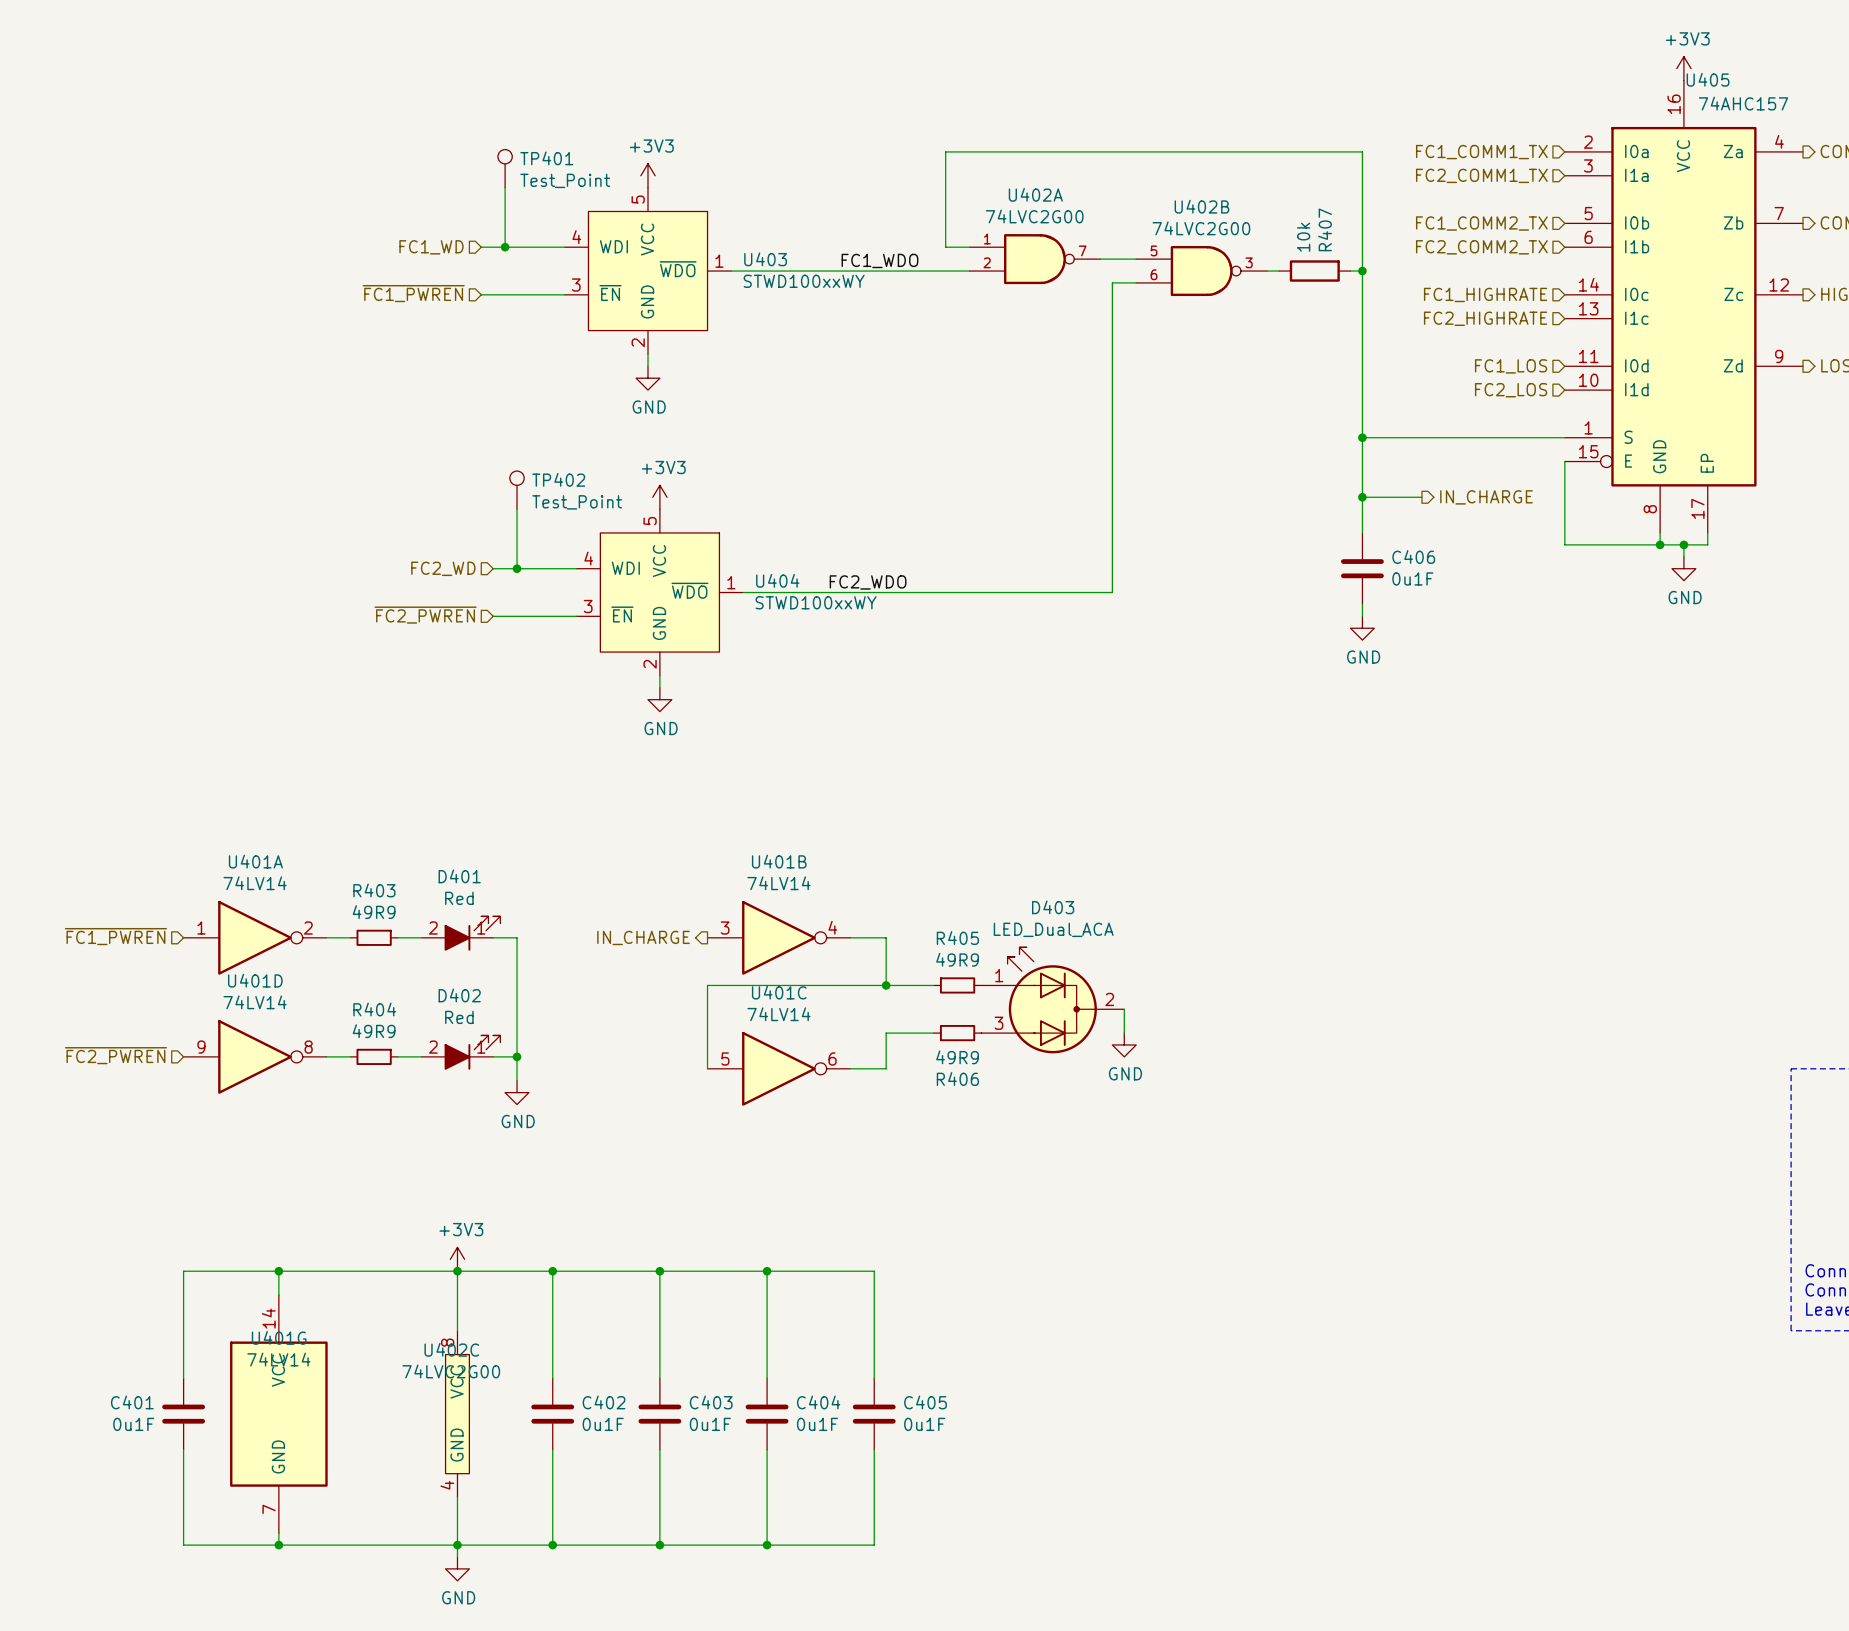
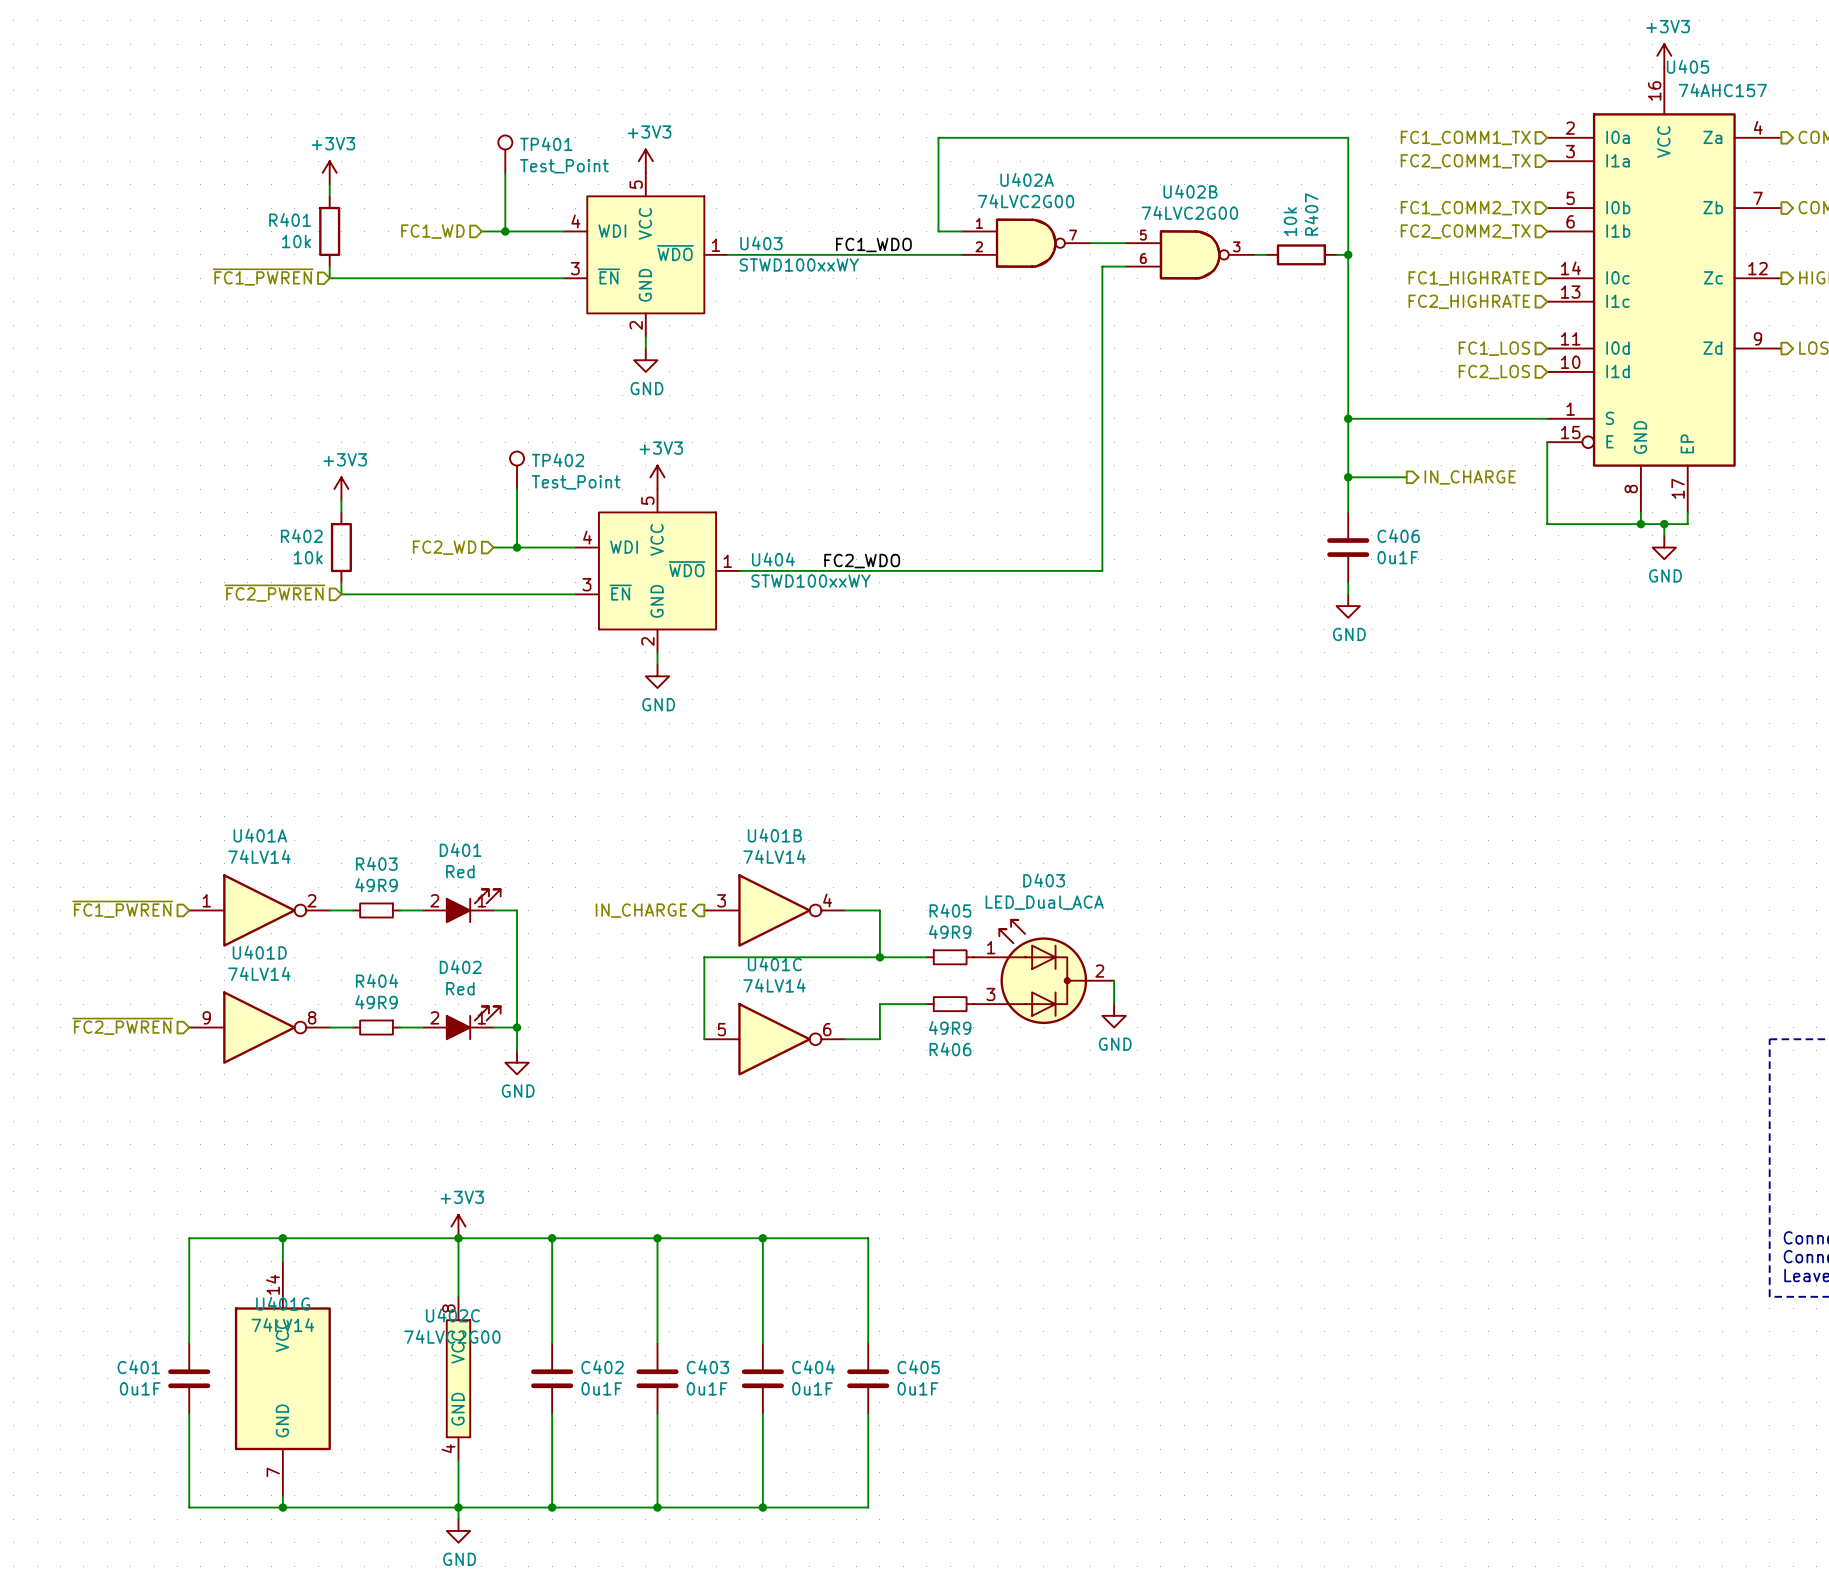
power symbol: none -> +3V3 (329, 172)
wire: none -> (329, 184) (329, 196)
R401: none -> 10k (329, 231)
wire: none -> (329, 266) (329, 278) (481, 278)
hierarchical label position: ~{FC1_PWREN} (413, 293) -> ~{FC1_PWREN} (263, 277)
power symbol: none -> +3V3 (341, 489)
wire: none -> (341, 500) (341, 512)
R402: none -> 10k (341, 547)
wire: none -> (341, 582) (341, 594) (493, 594)
hierarchical label position: ~{FC2_PWREN} (425, 615) -> ~{FC2_PWREN} (274, 593)

